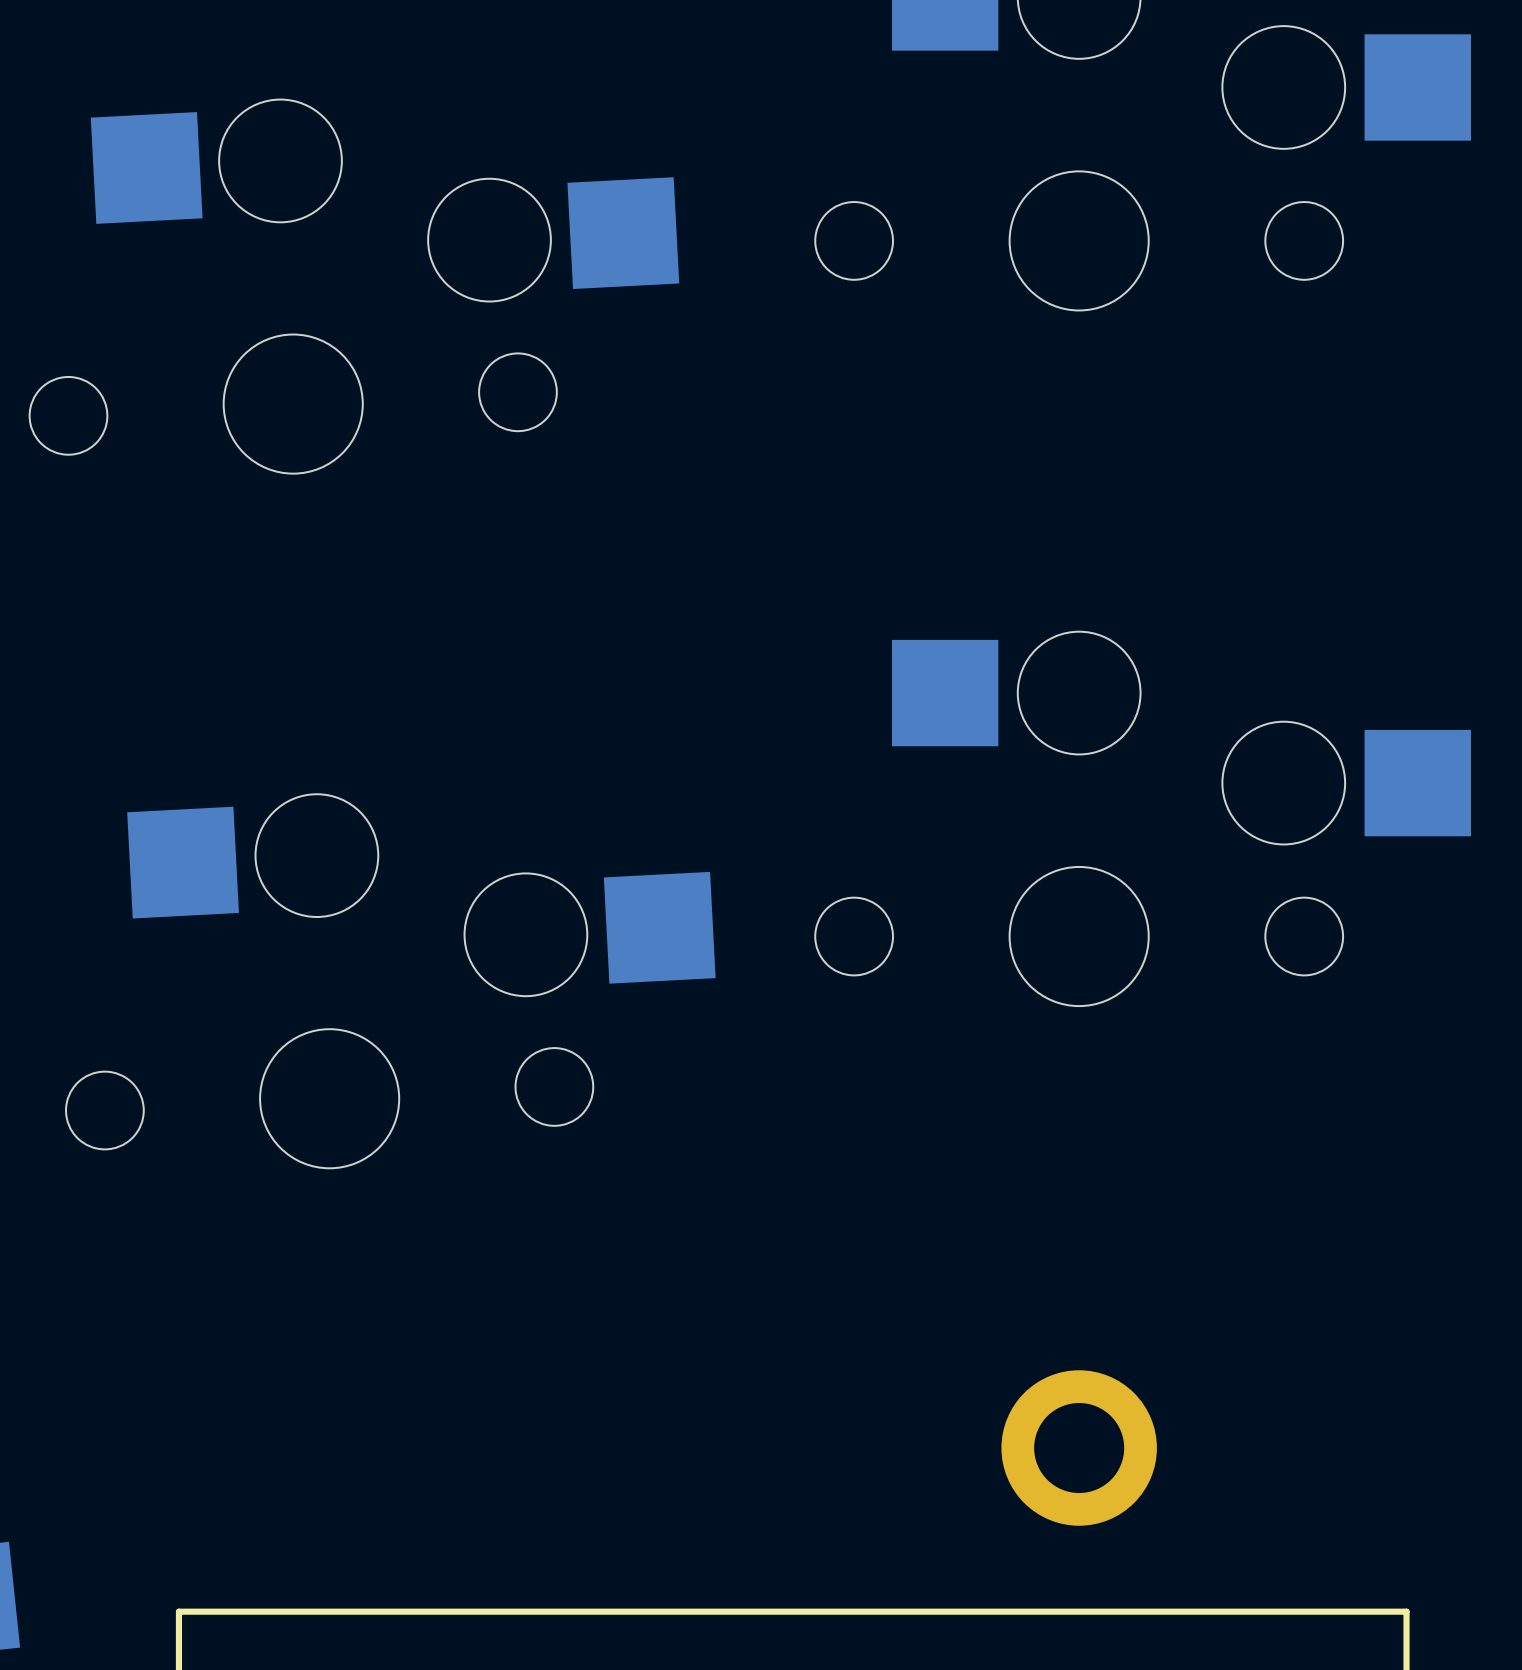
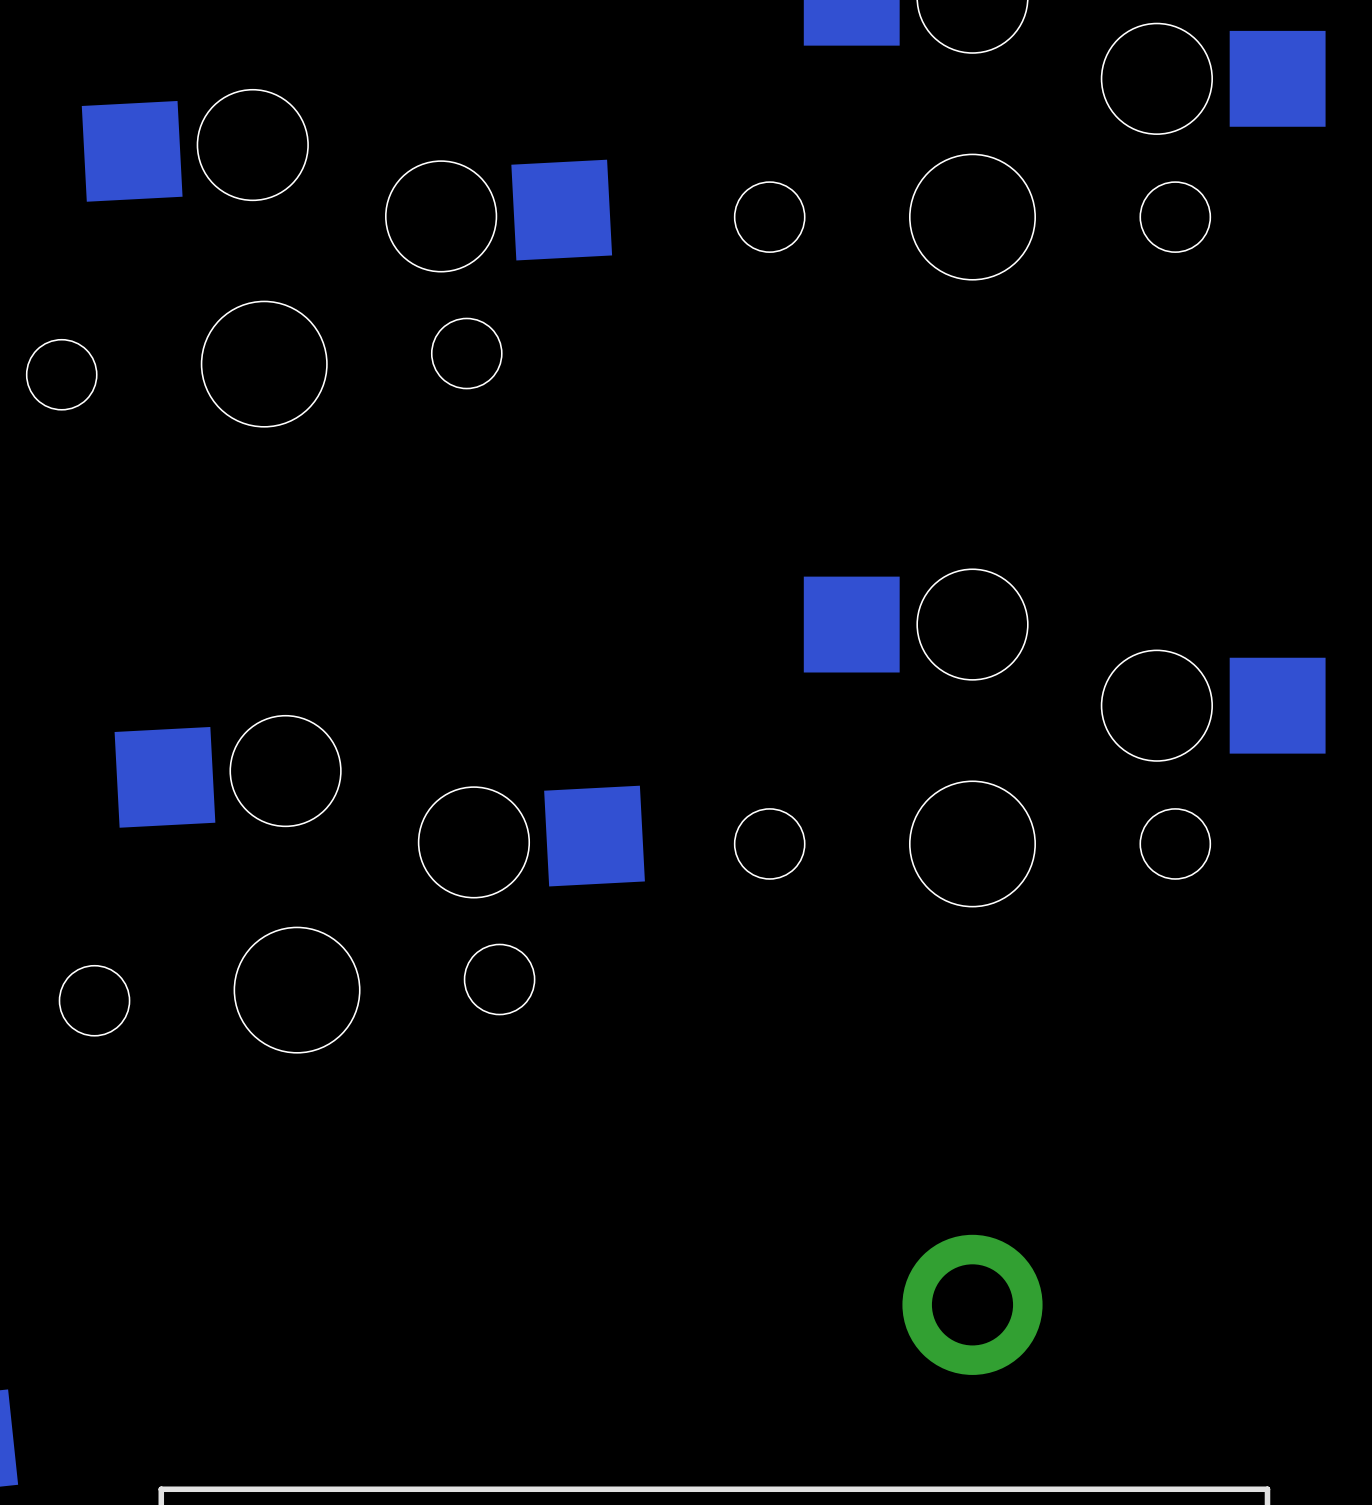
line: (178, 1652) (178, 1611) (1406, 1611) (1406, 1652) -> (161, 1489) (1267, 1489)

